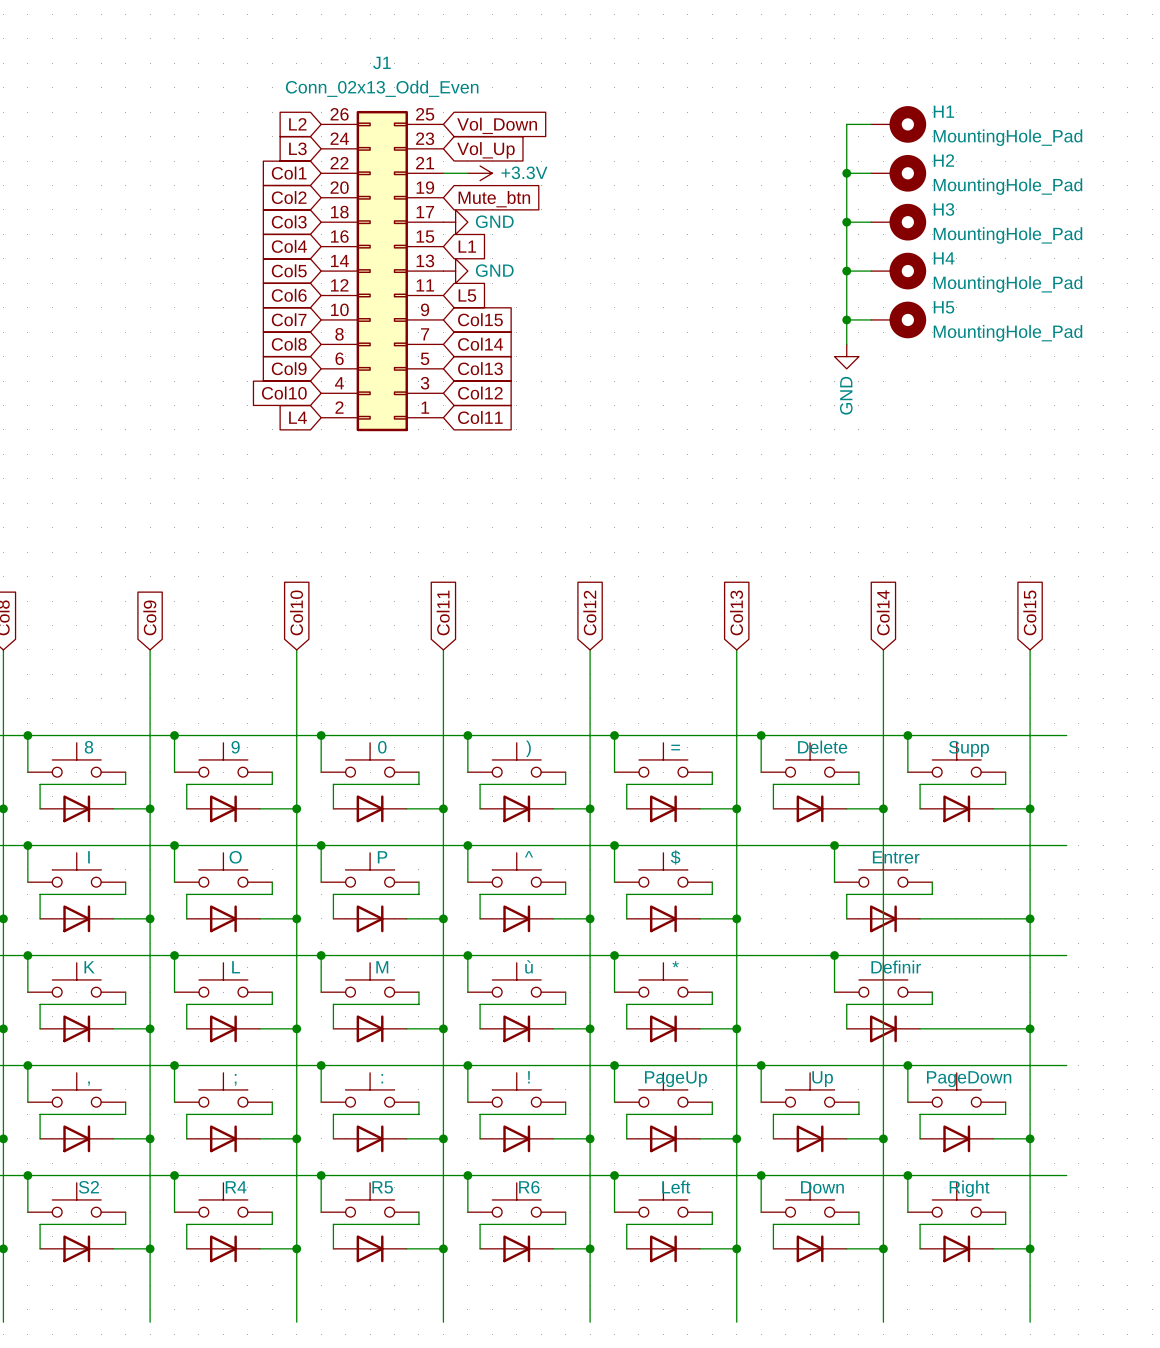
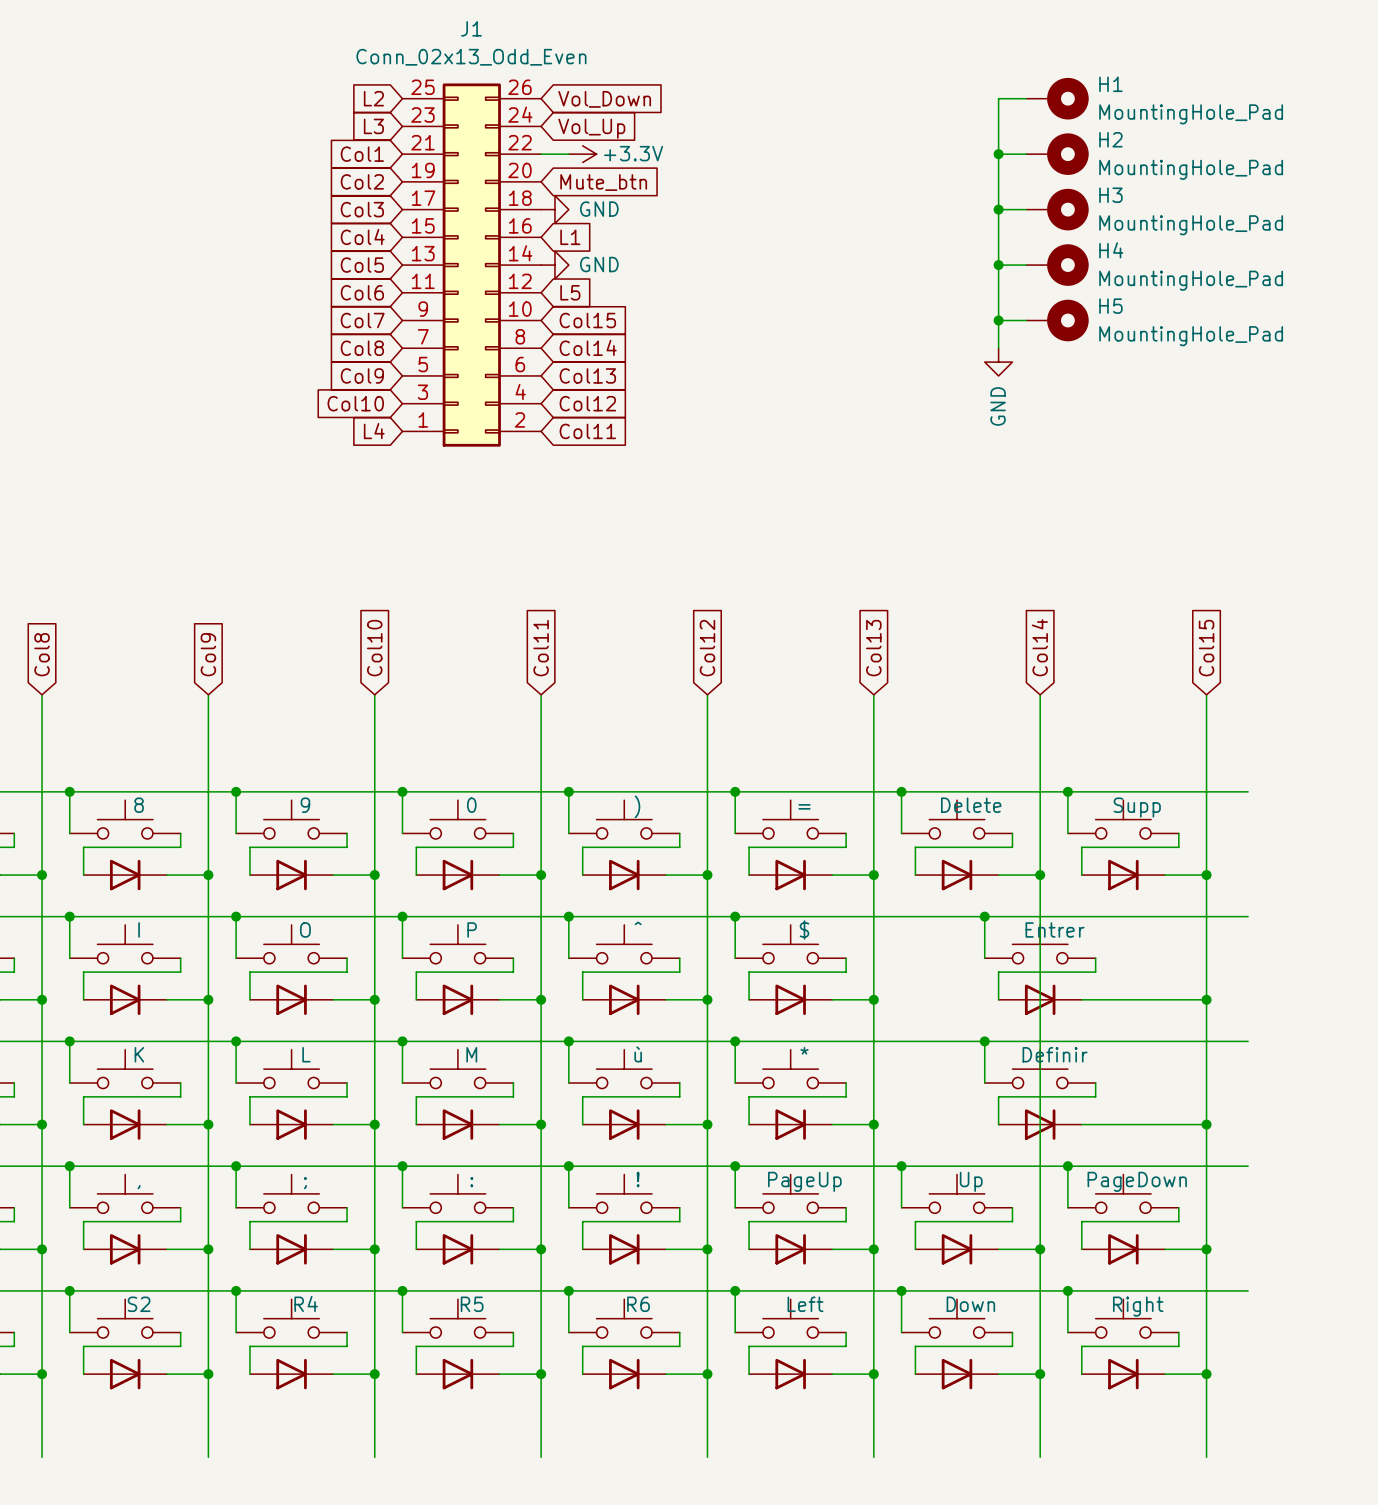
J1 flip: as is (382, 271) -> left-right (471, 265)

